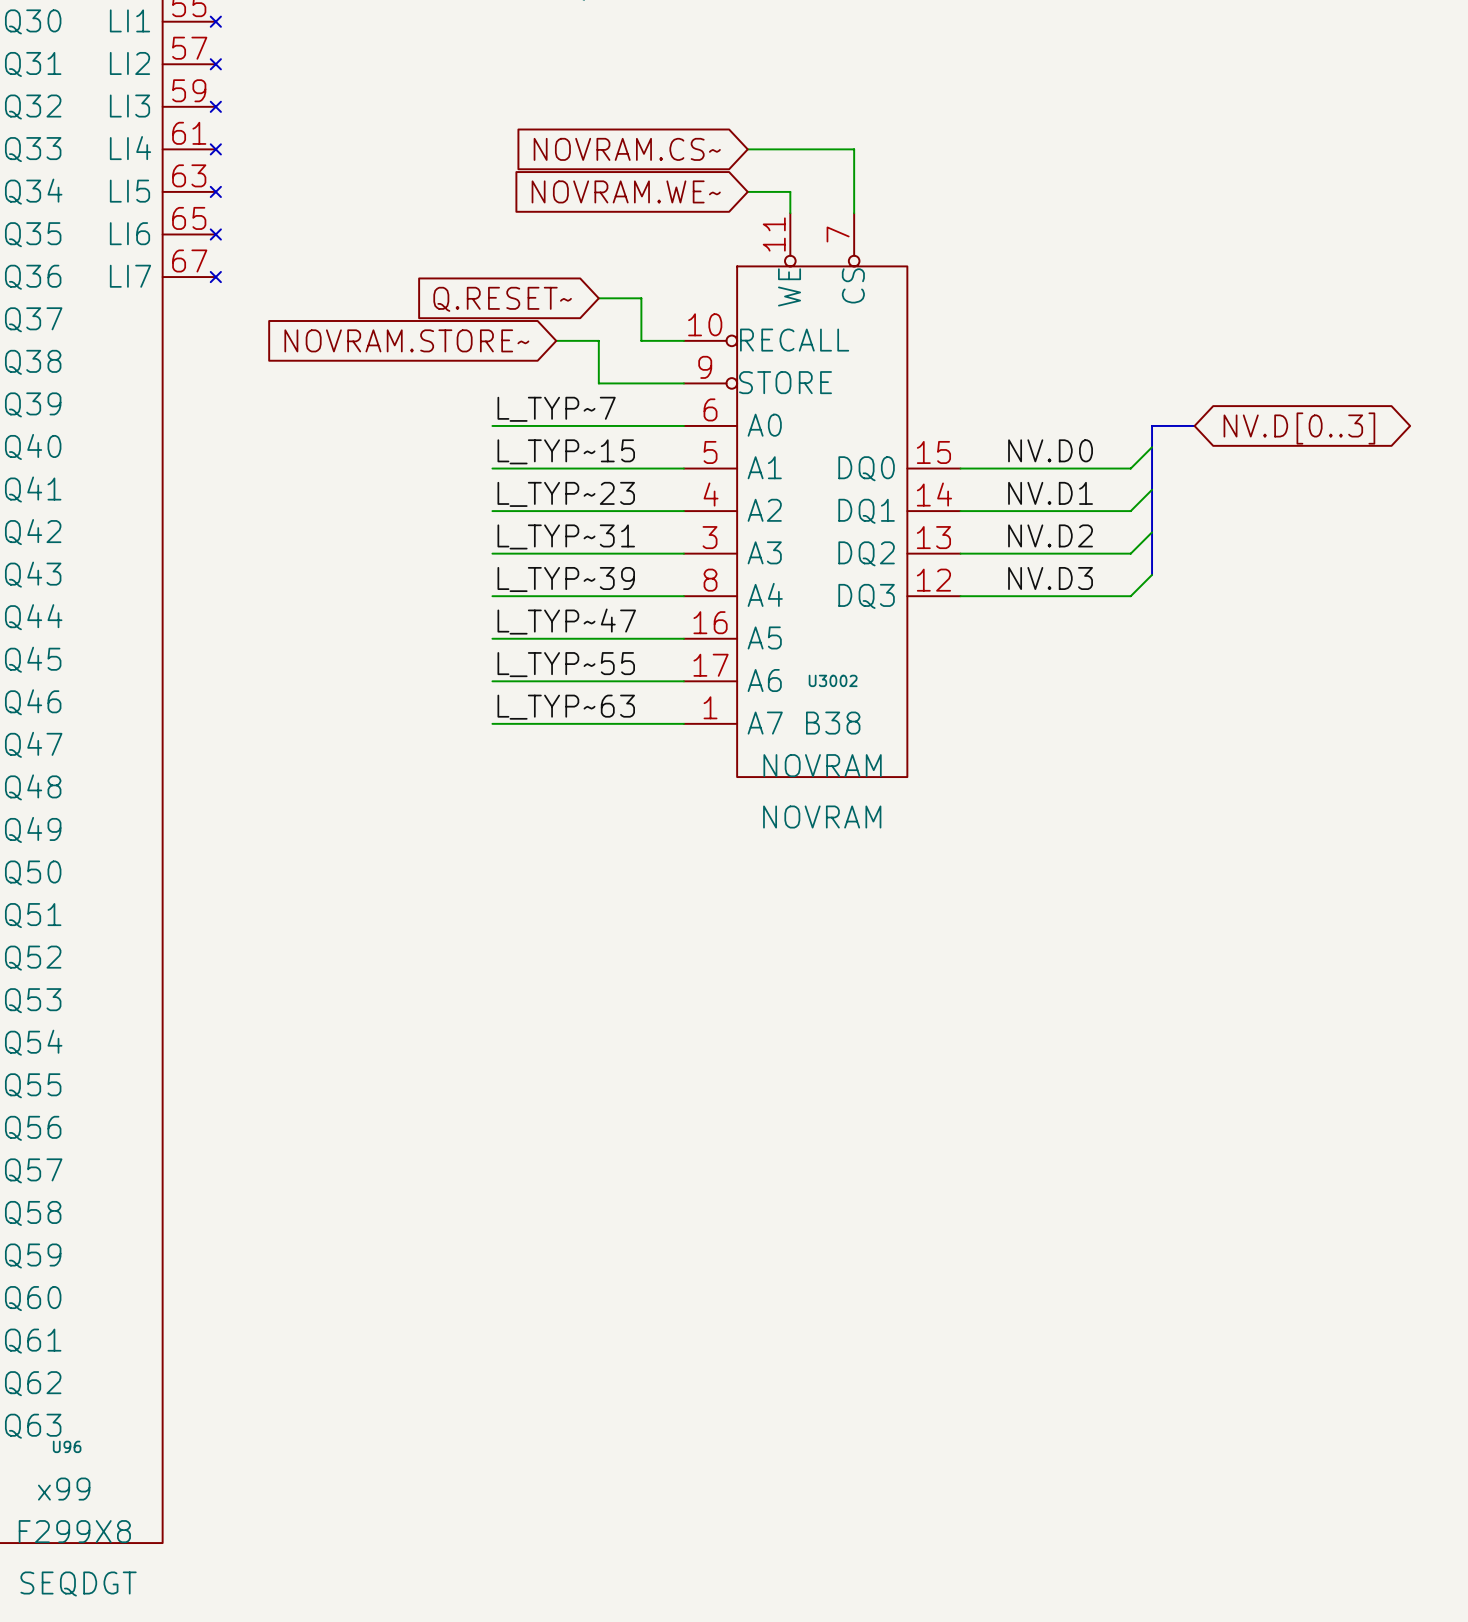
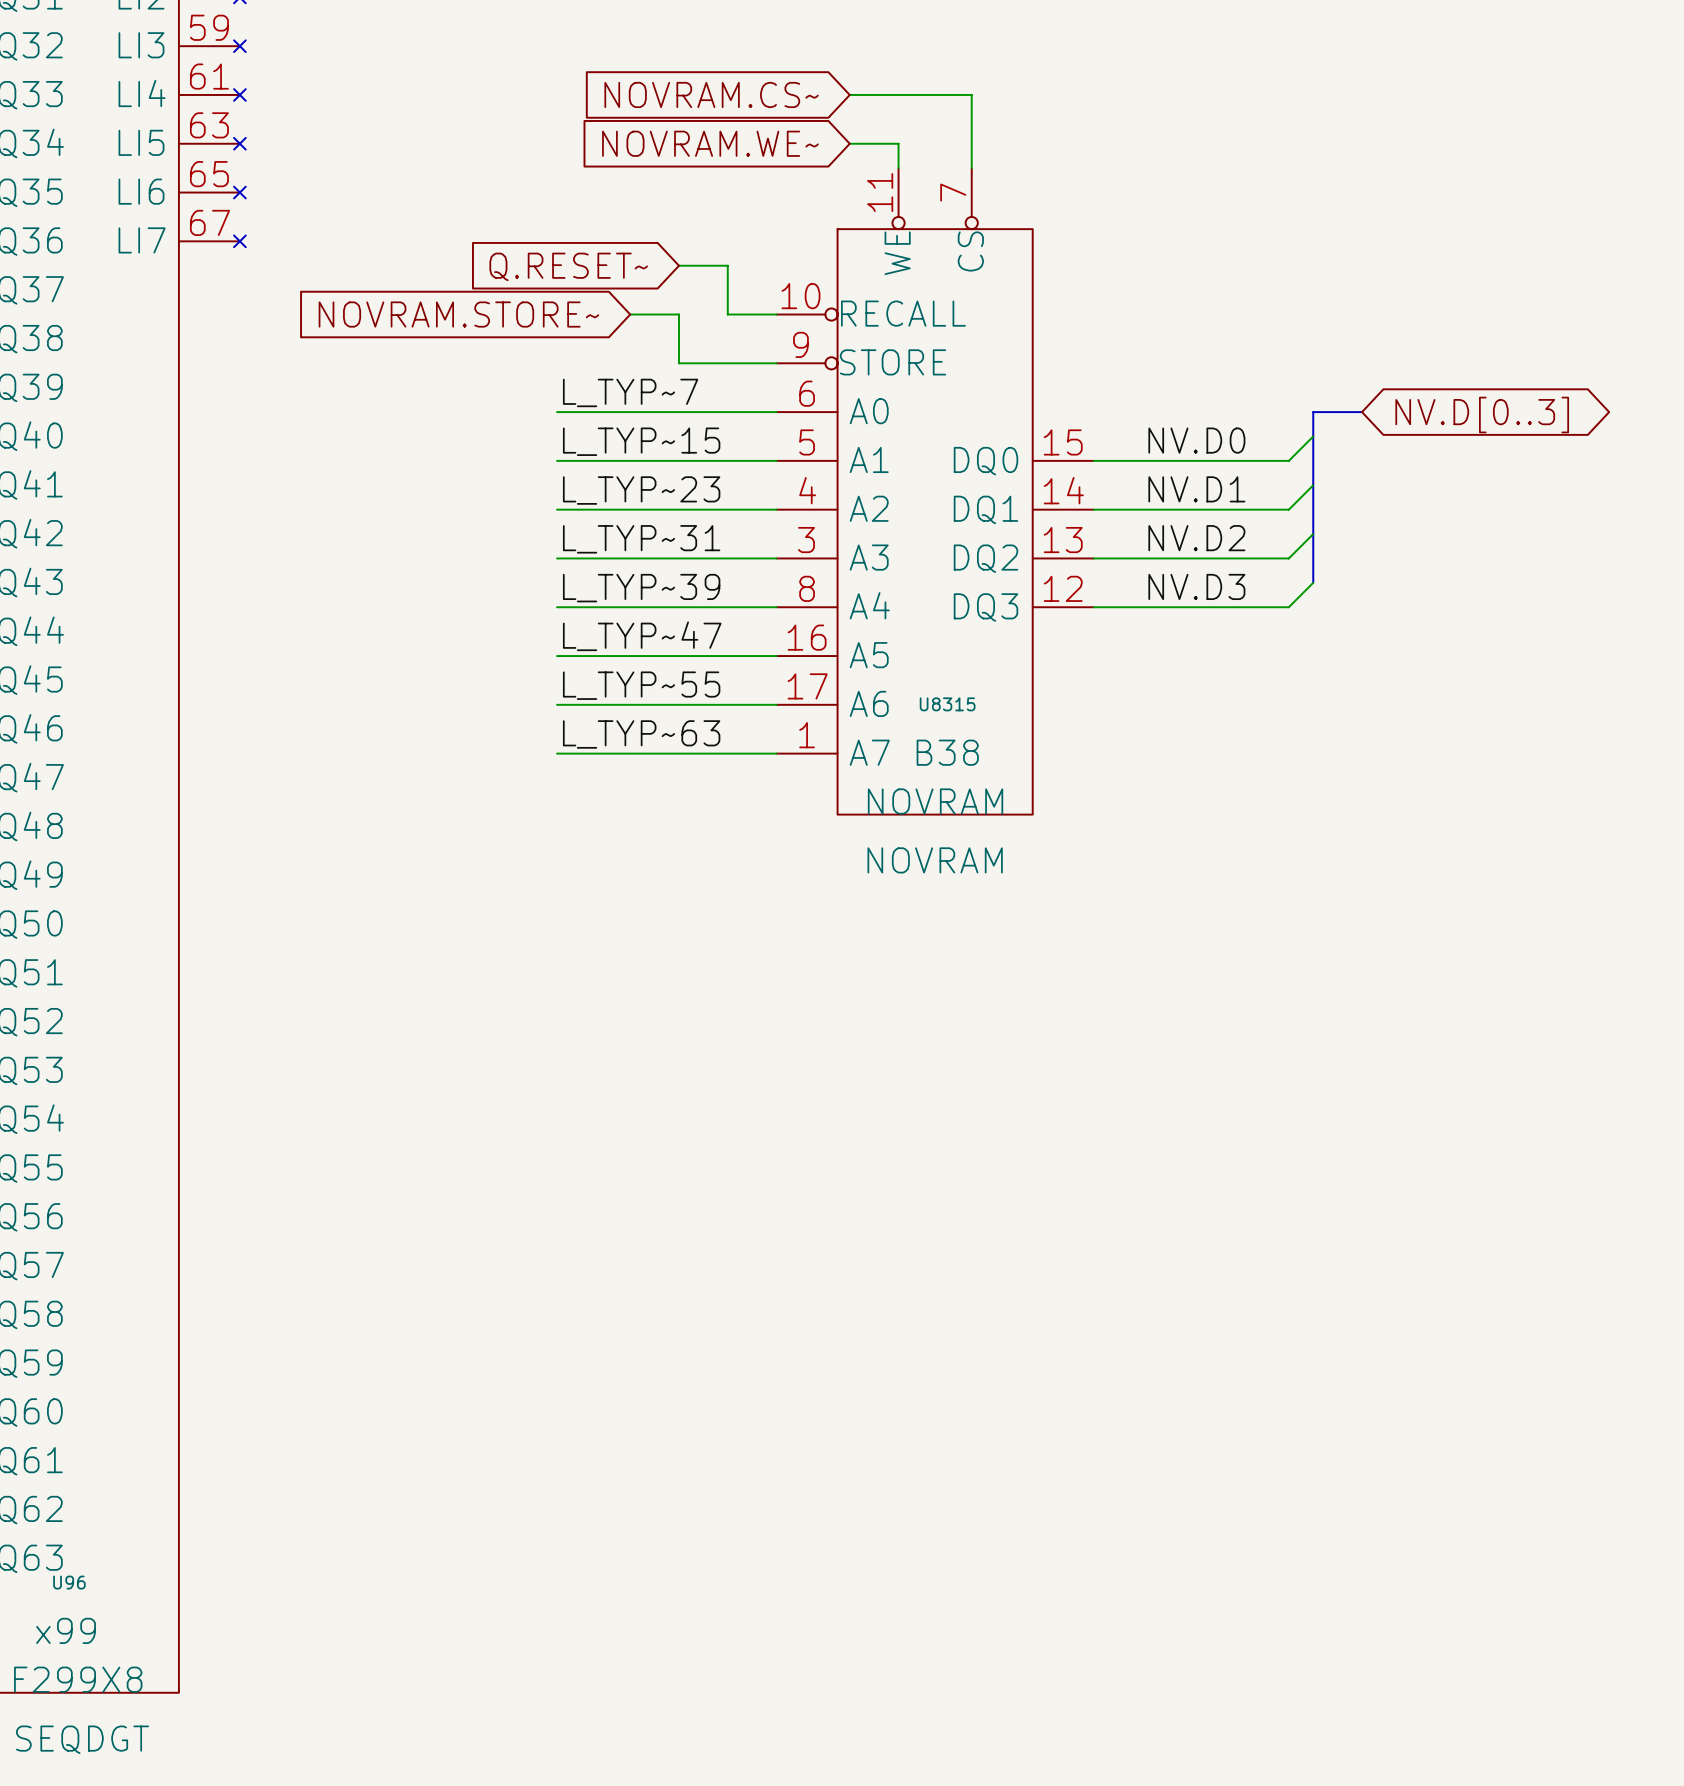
U3002 name: U3002 (833, 680) -> U8315 (947, 704)

